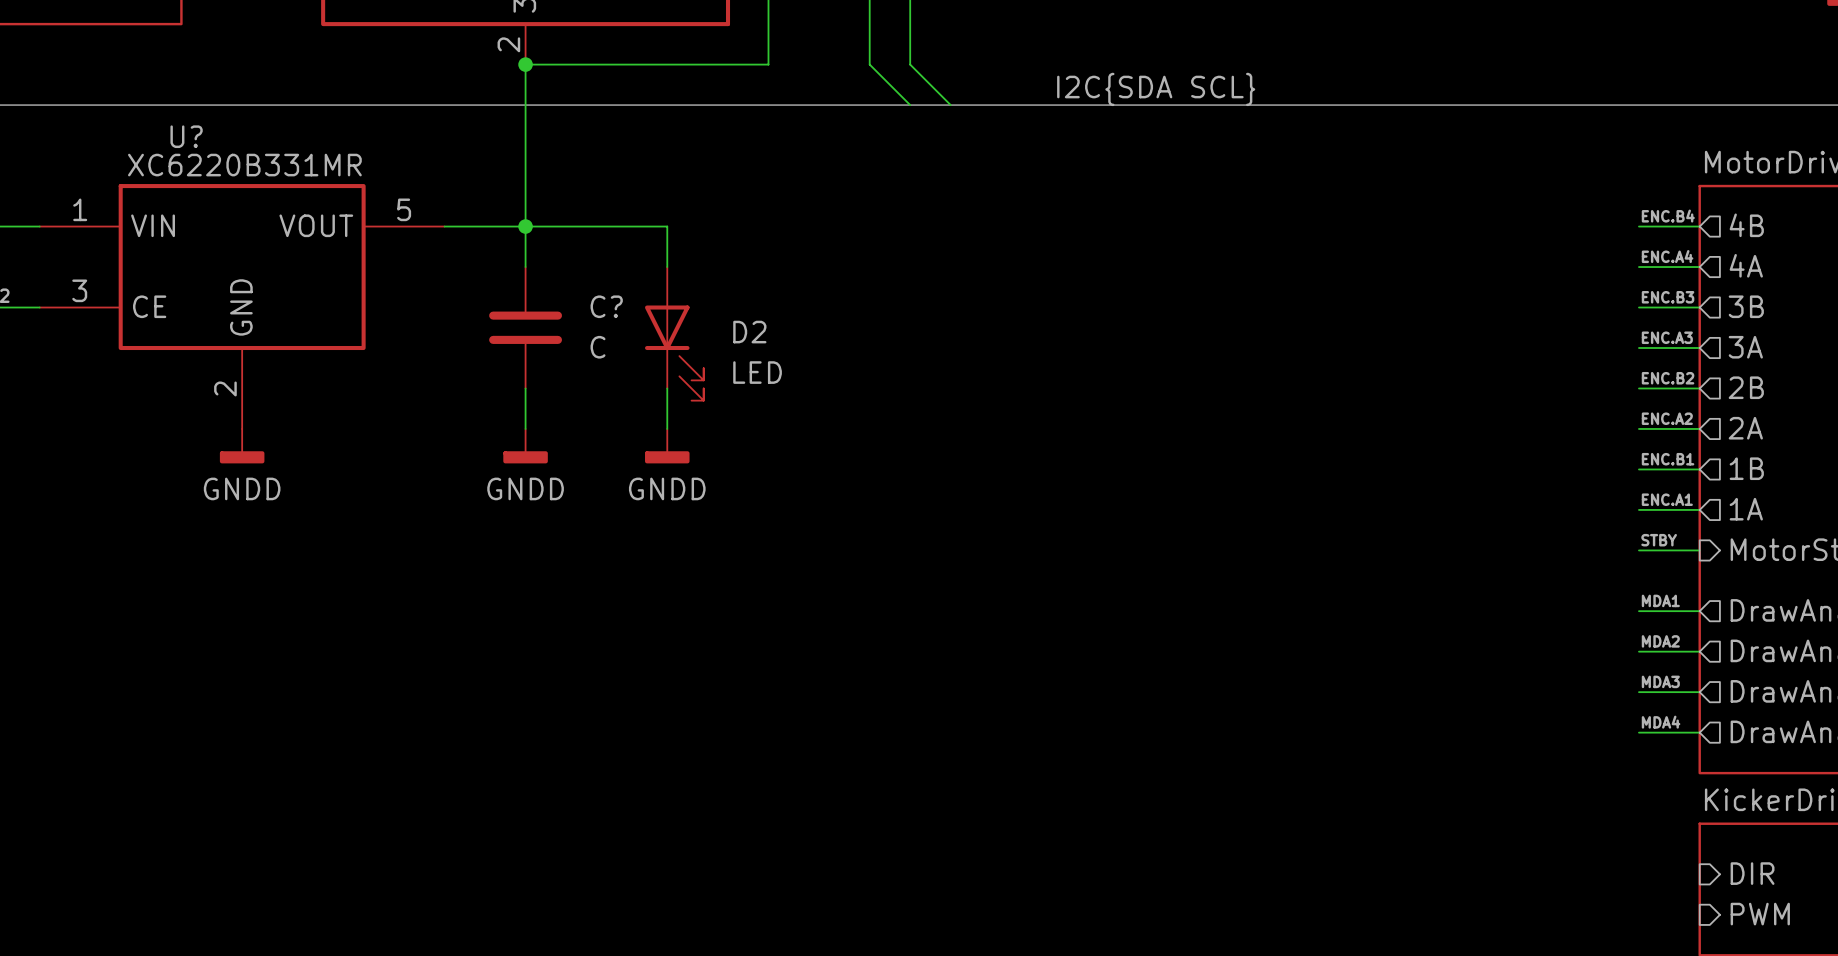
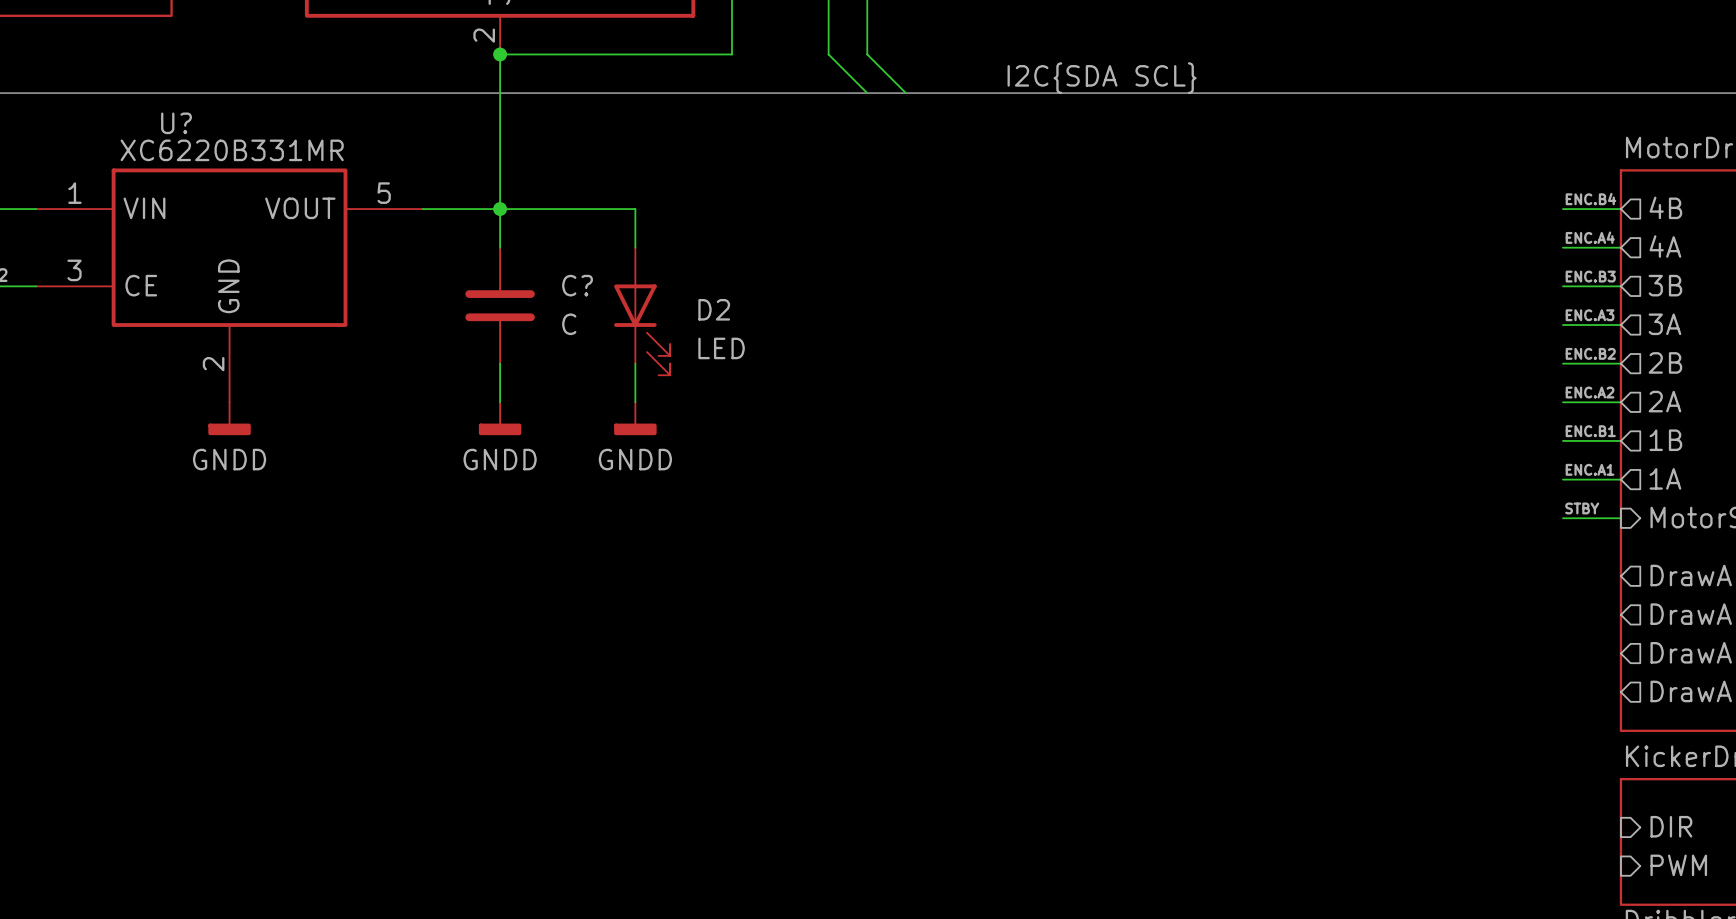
label: MDA1 (1660, 600) -> none
wire: (1638, 611) (1699, 611) -> none
label: MDA2 (1660, 641) -> none
wire: (1638, 651) (1699, 651) -> none
label: MDA3 (1660, 681) -> none
wire: (1638, 692) (1699, 692) -> none
label: MDA4 (1661, 722) -> none
wire: (1638, 732) (1699, 732) -> none

